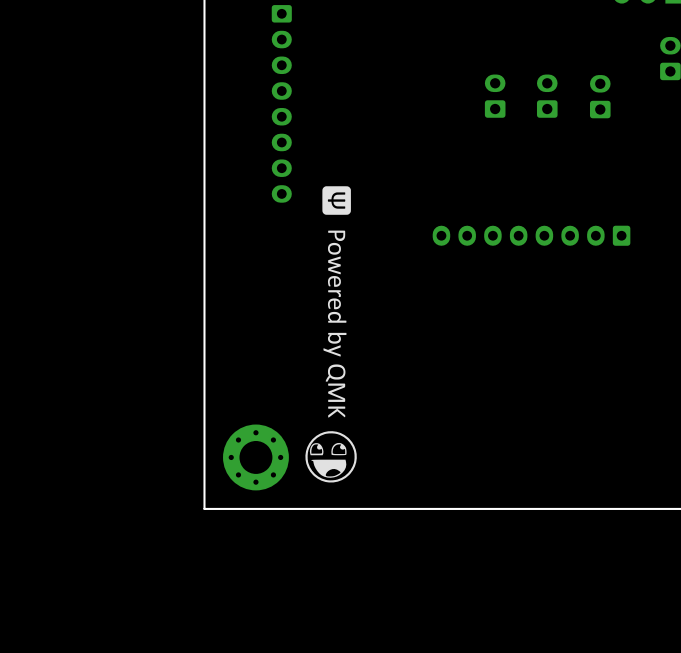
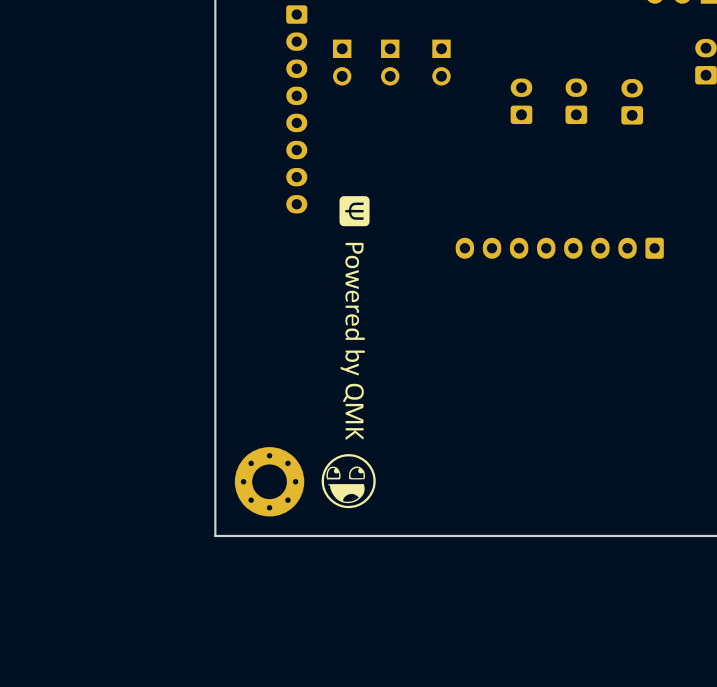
part: none -> (342, 62)
part: none -> (390, 62)
part: none -> (441, 62)

